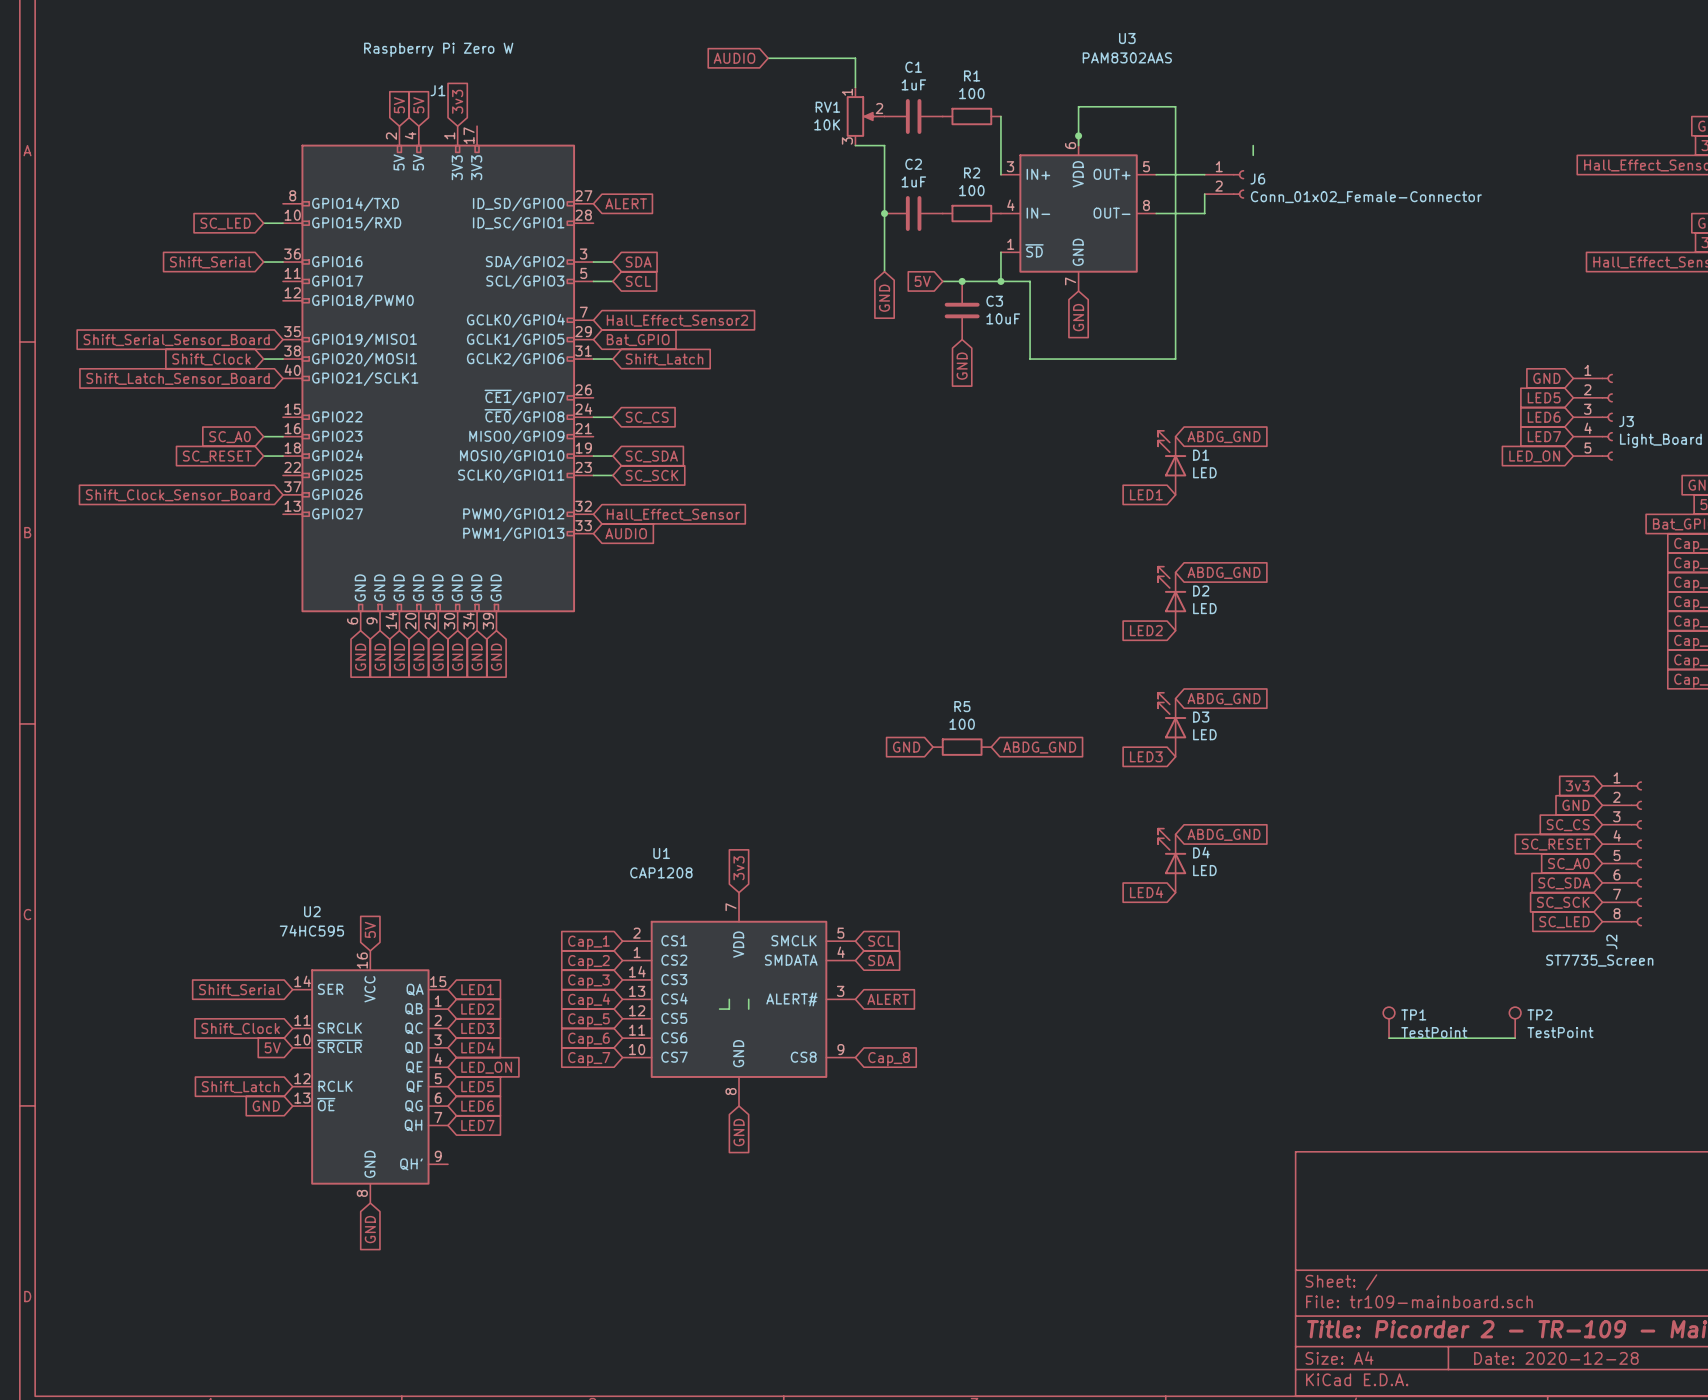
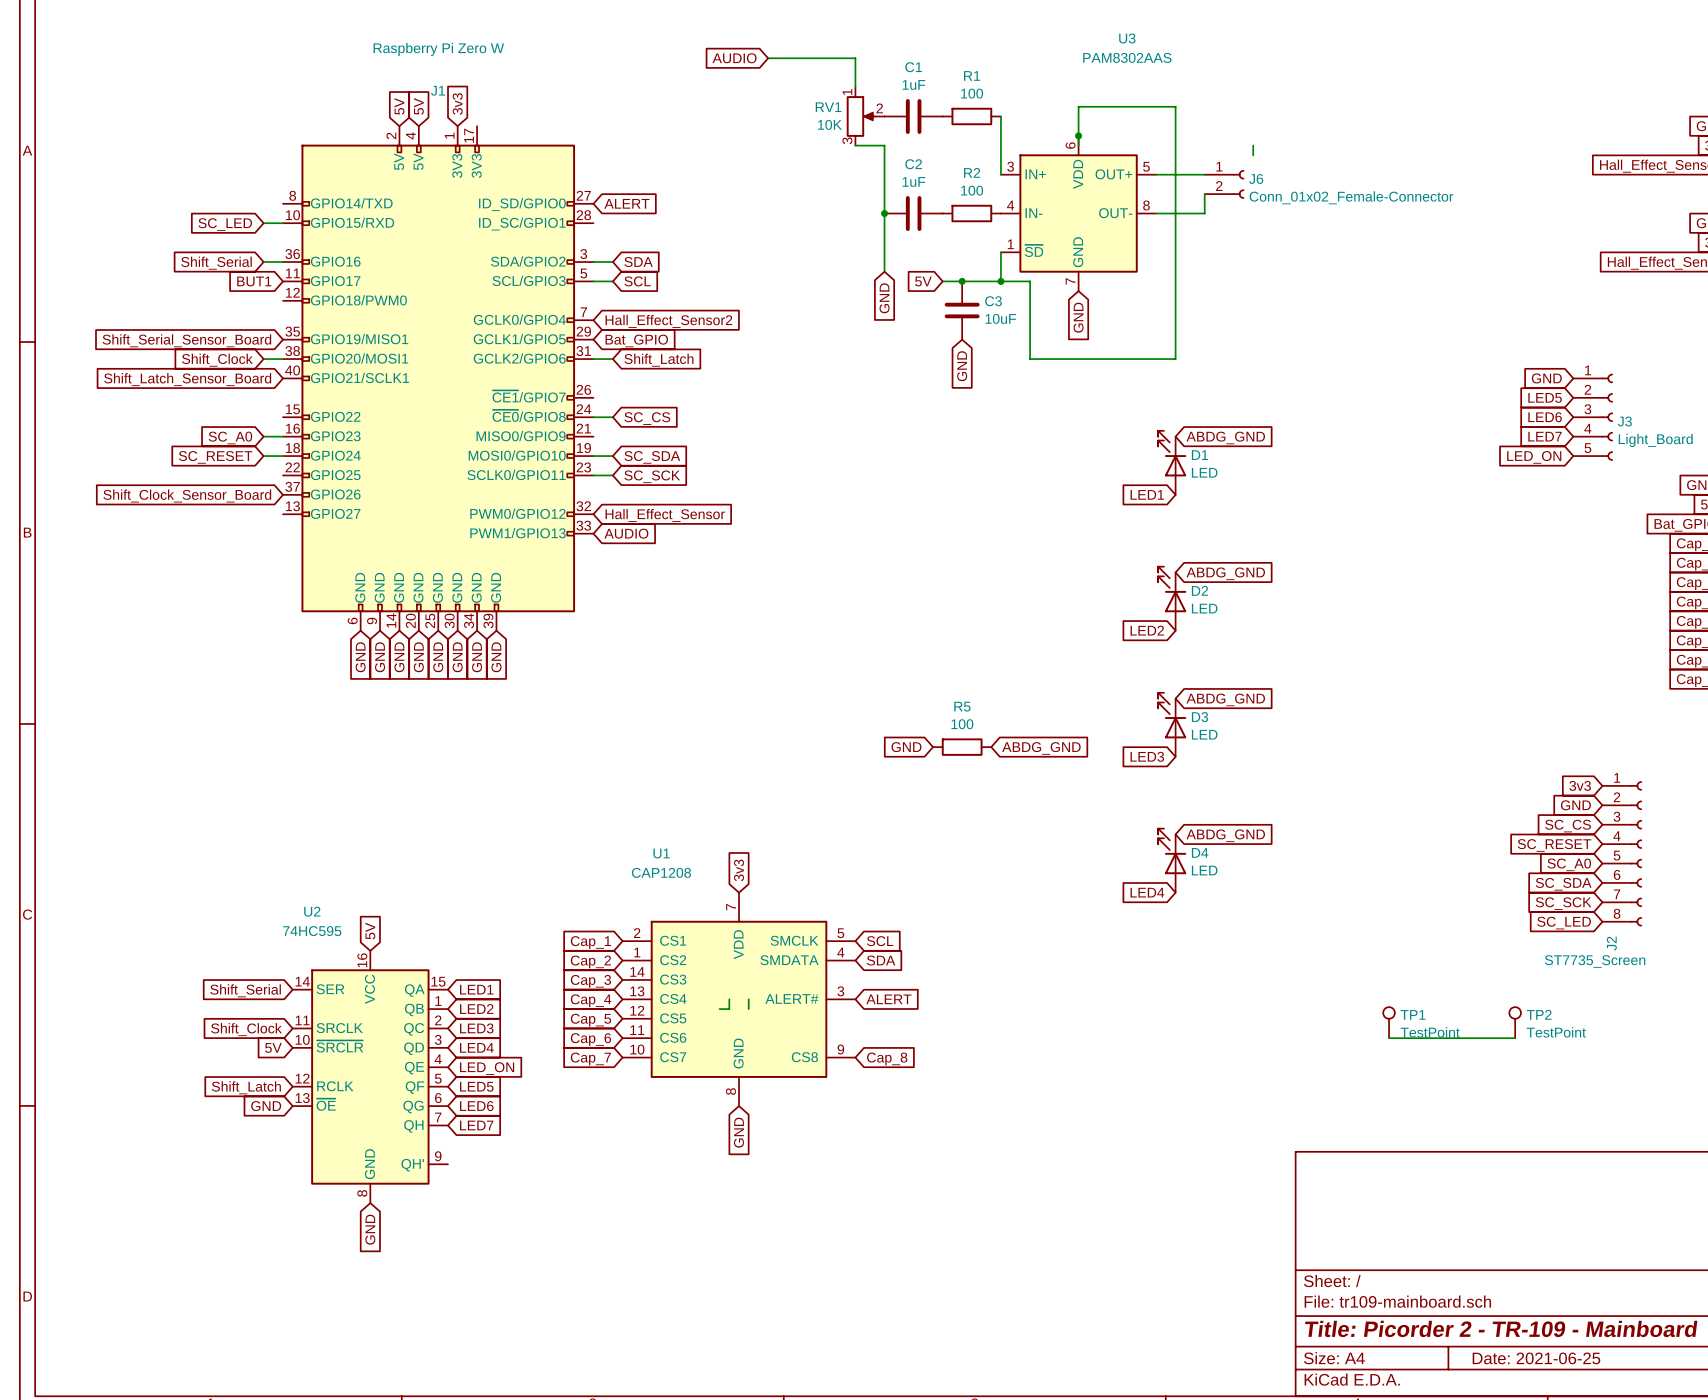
global label: none -> BUT1 (254, 281)
title block: Date: 2020-12-28 (1556, 1358) -> Date: 2021-06-25 (1536, 1358)

